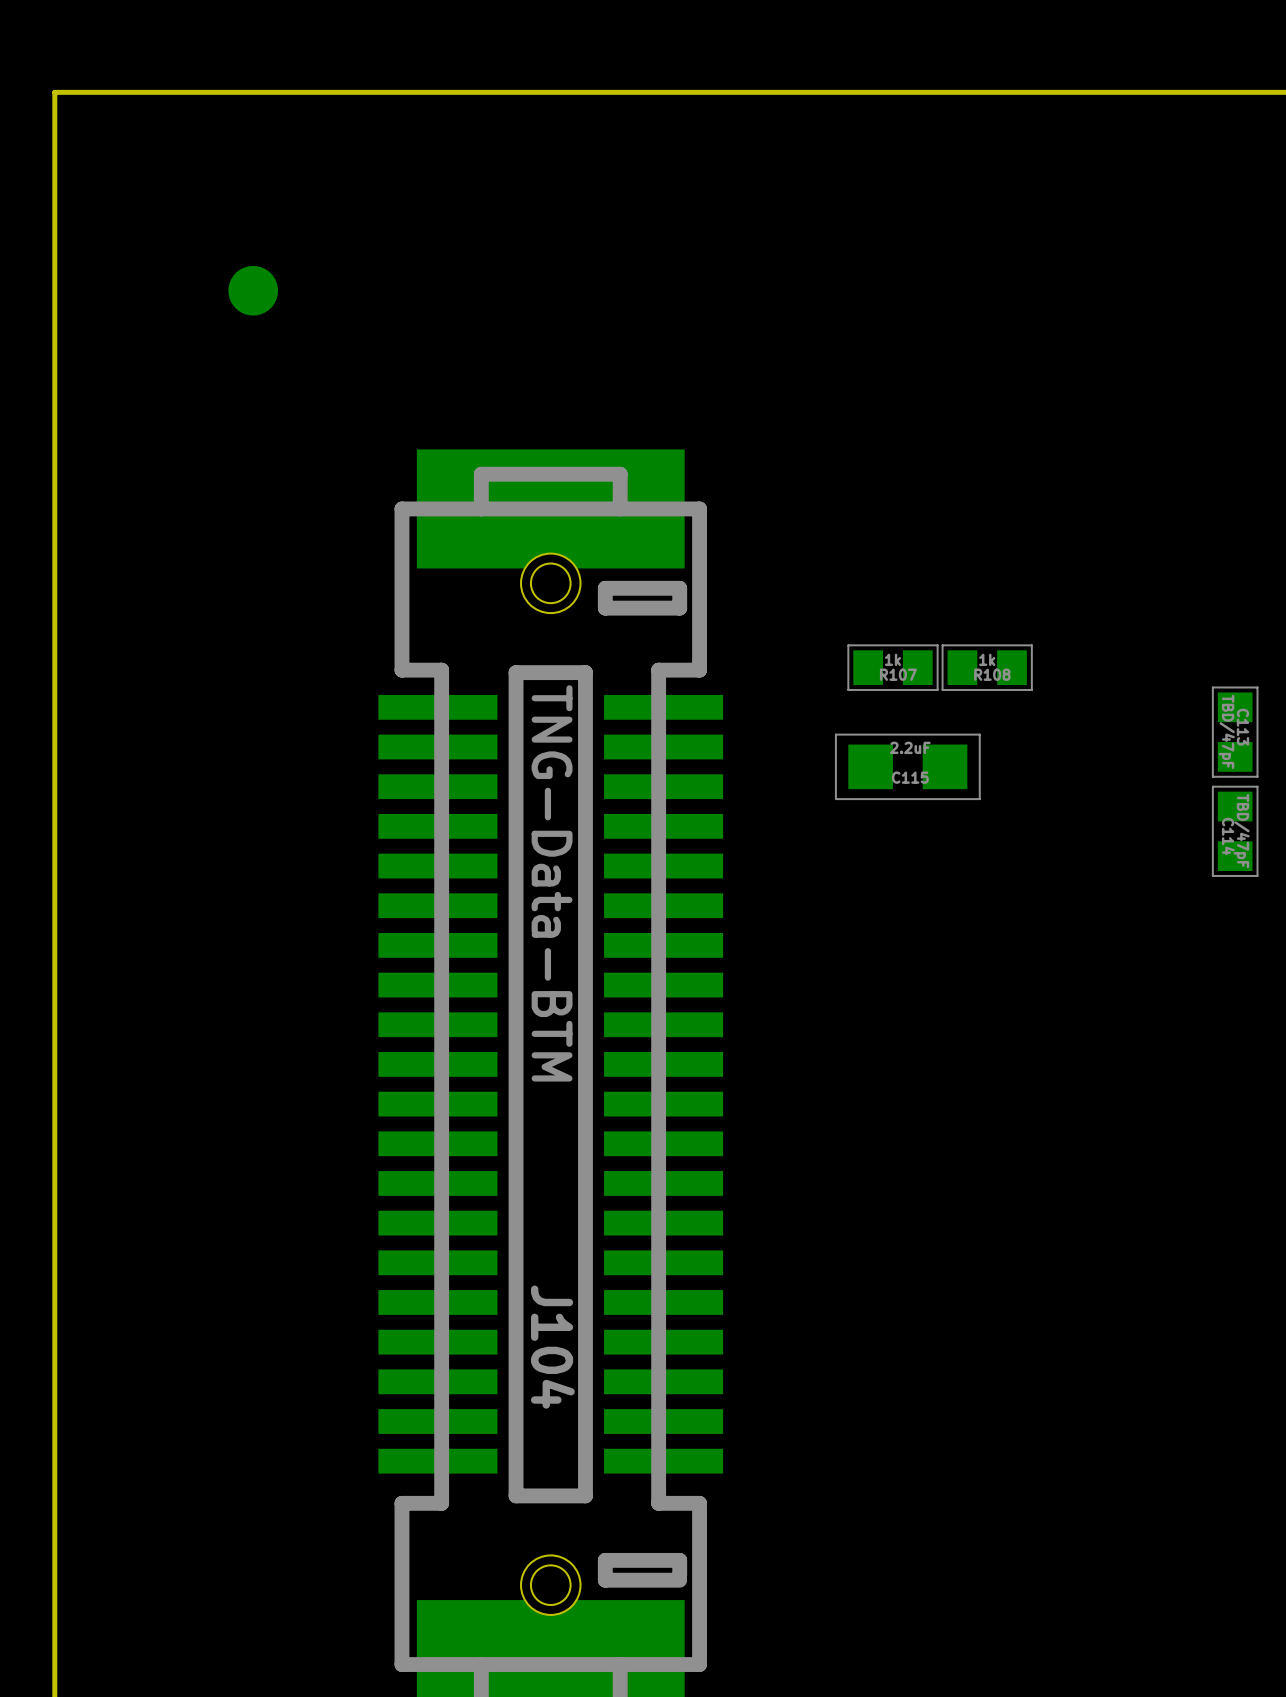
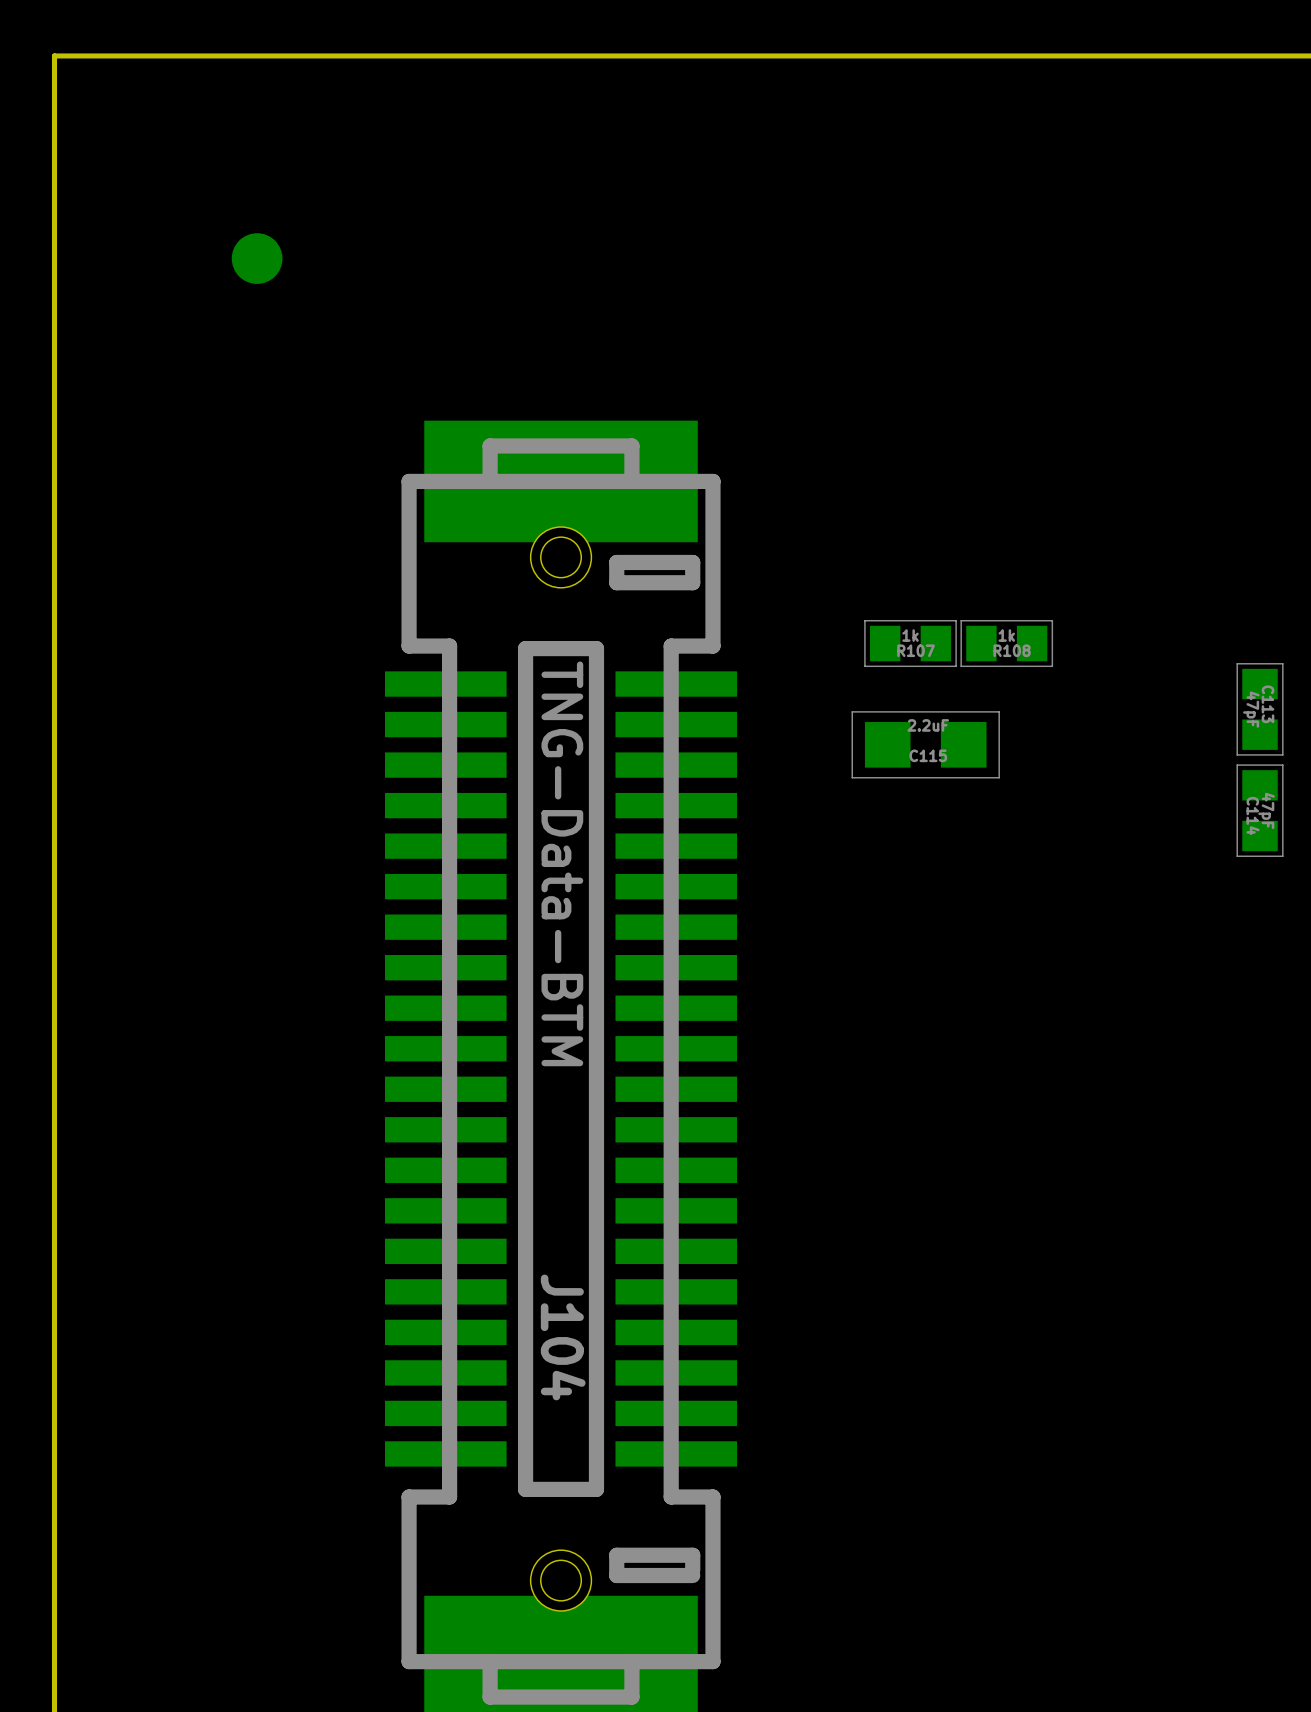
C113 value: TBD/47pF (1226, 731) -> 47pF (1251, 709)
C114 value: TBD/47pF (1241, 831) -> 47pF (1266, 810)

